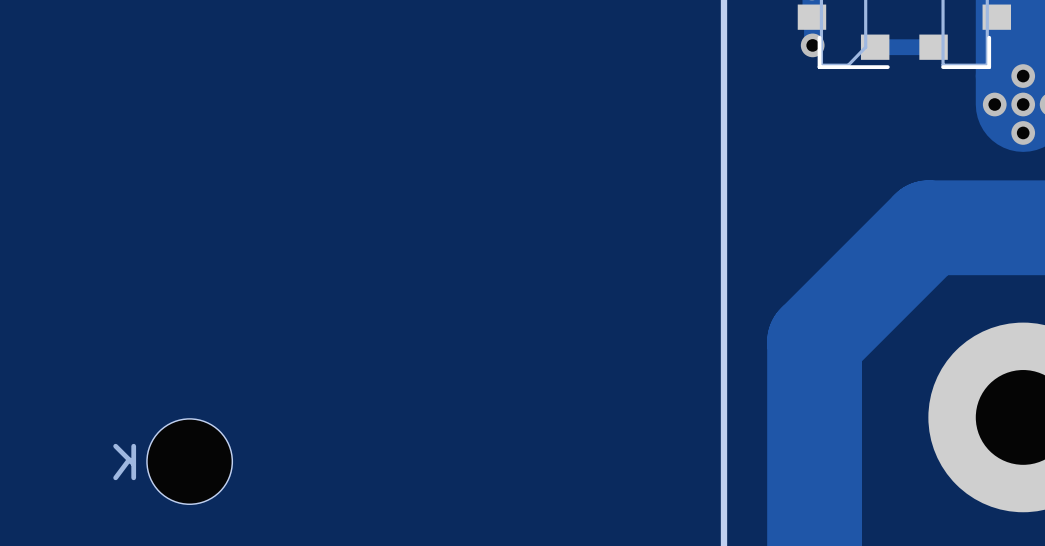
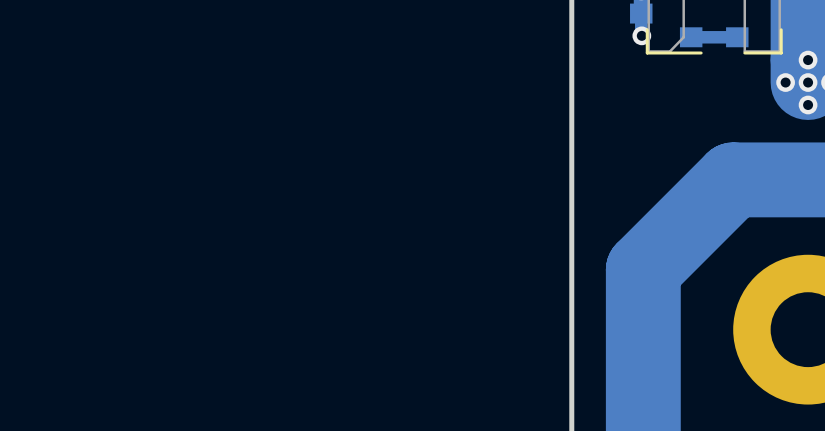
part: (189, 461) -> none

